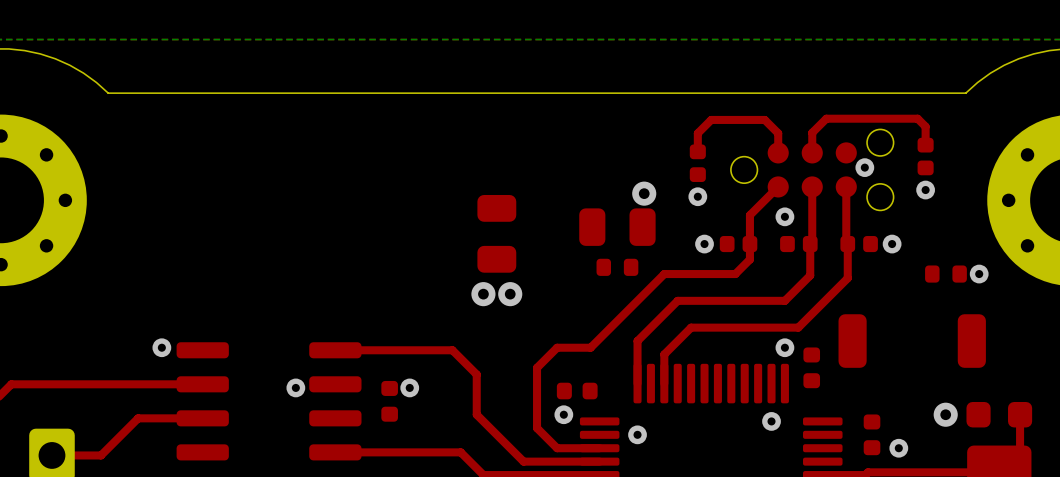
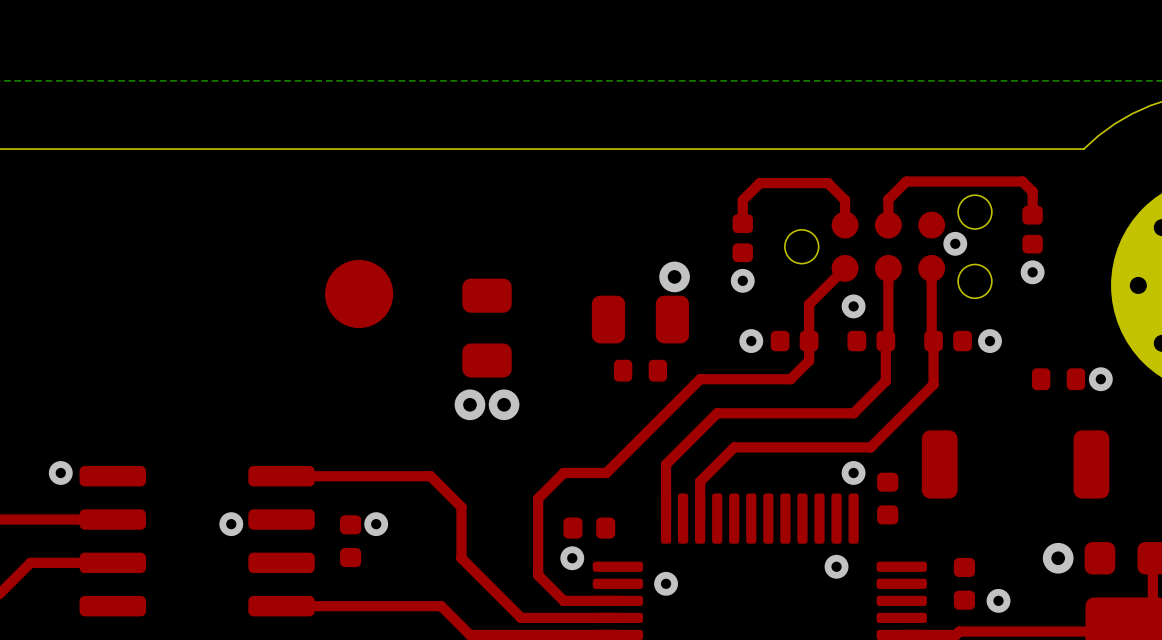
part: none -> (359, 293)

